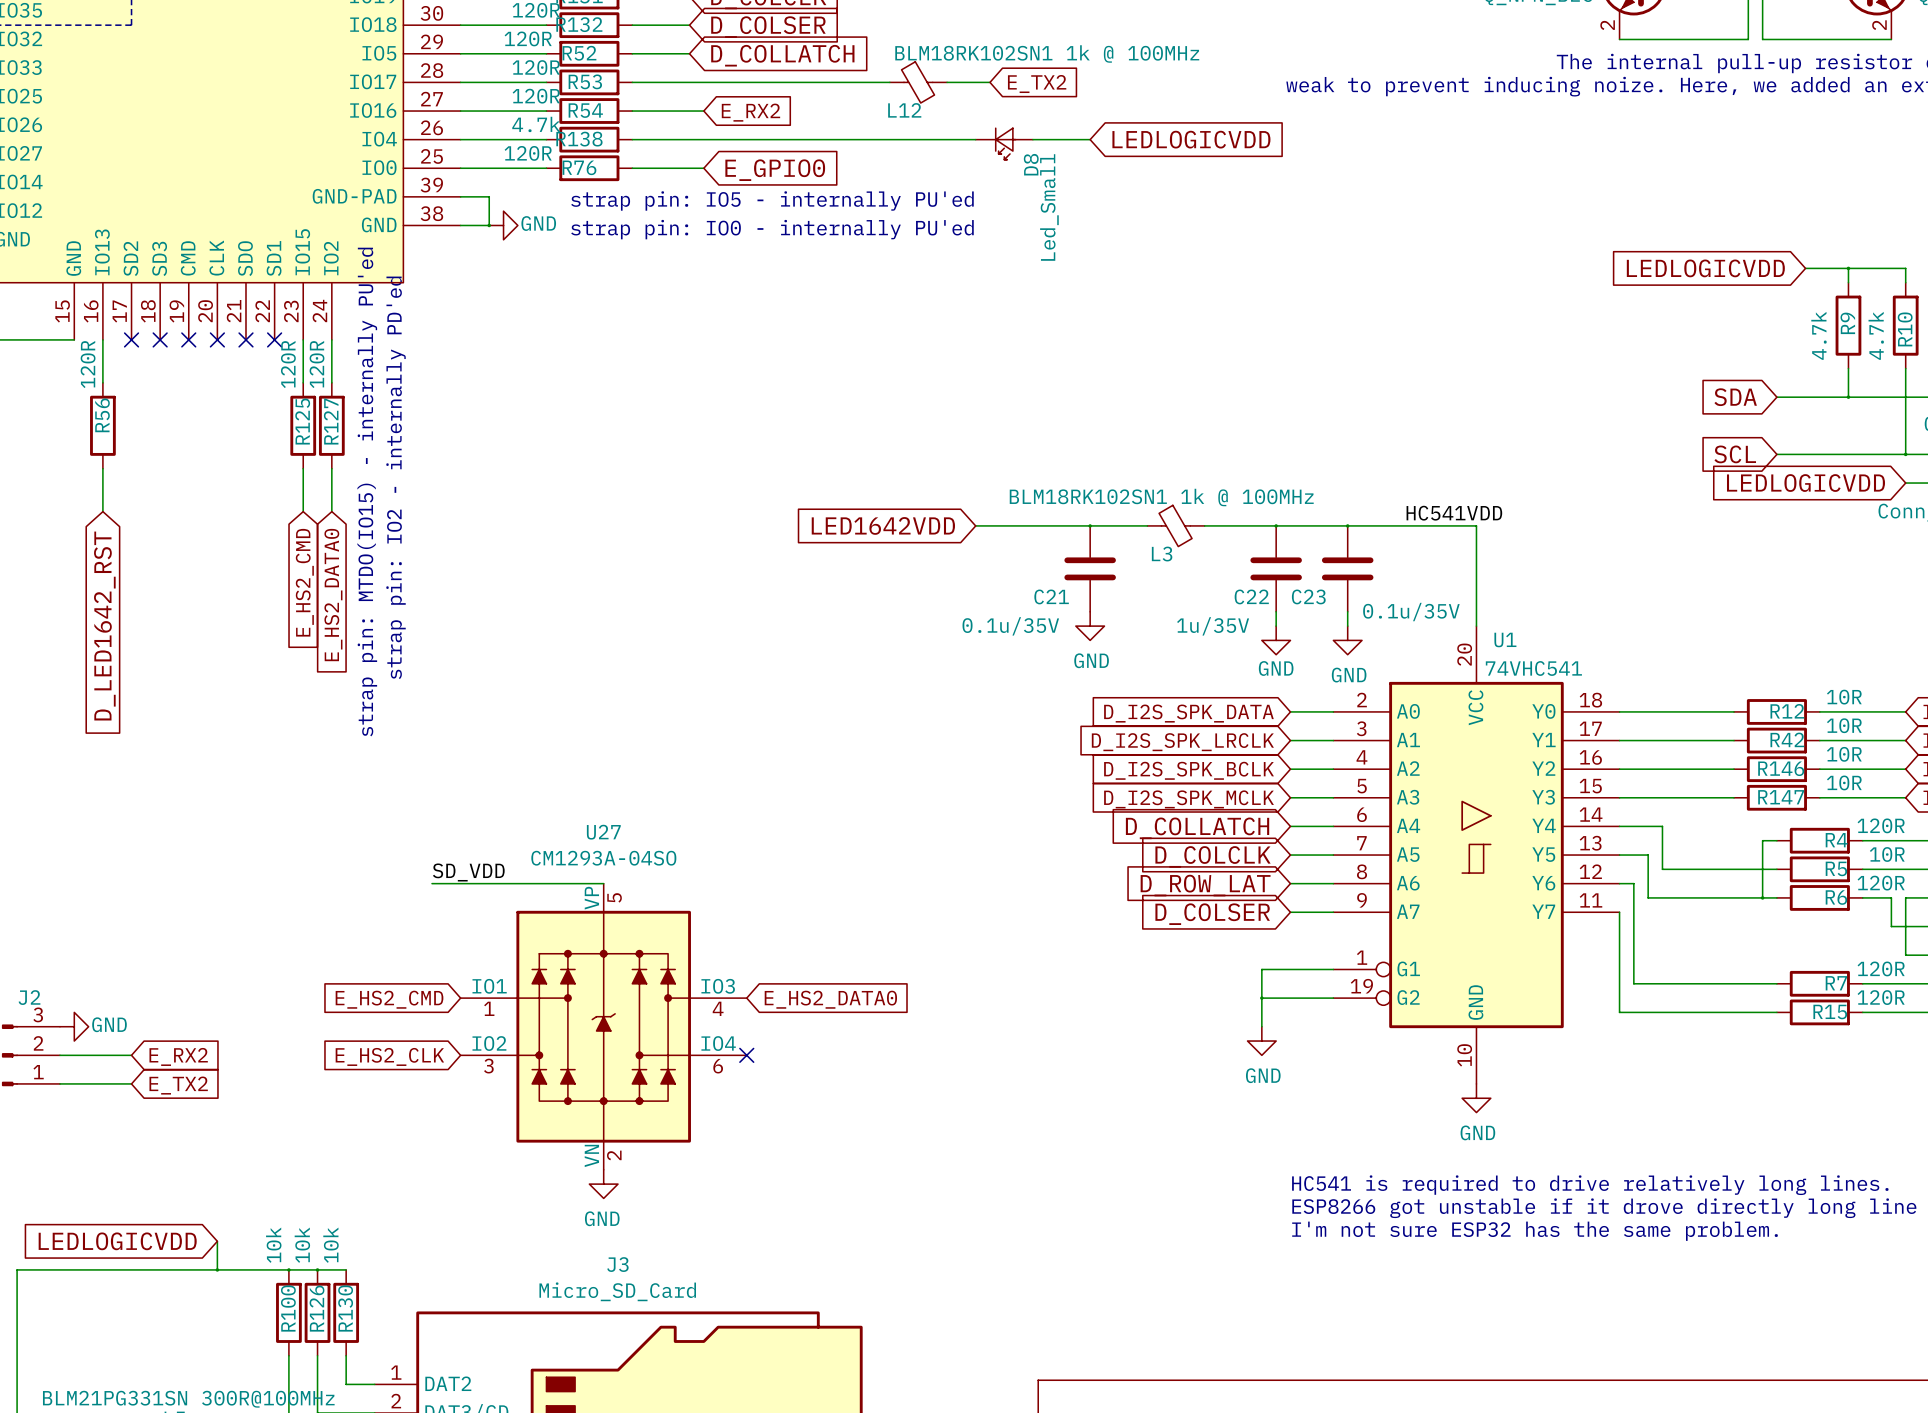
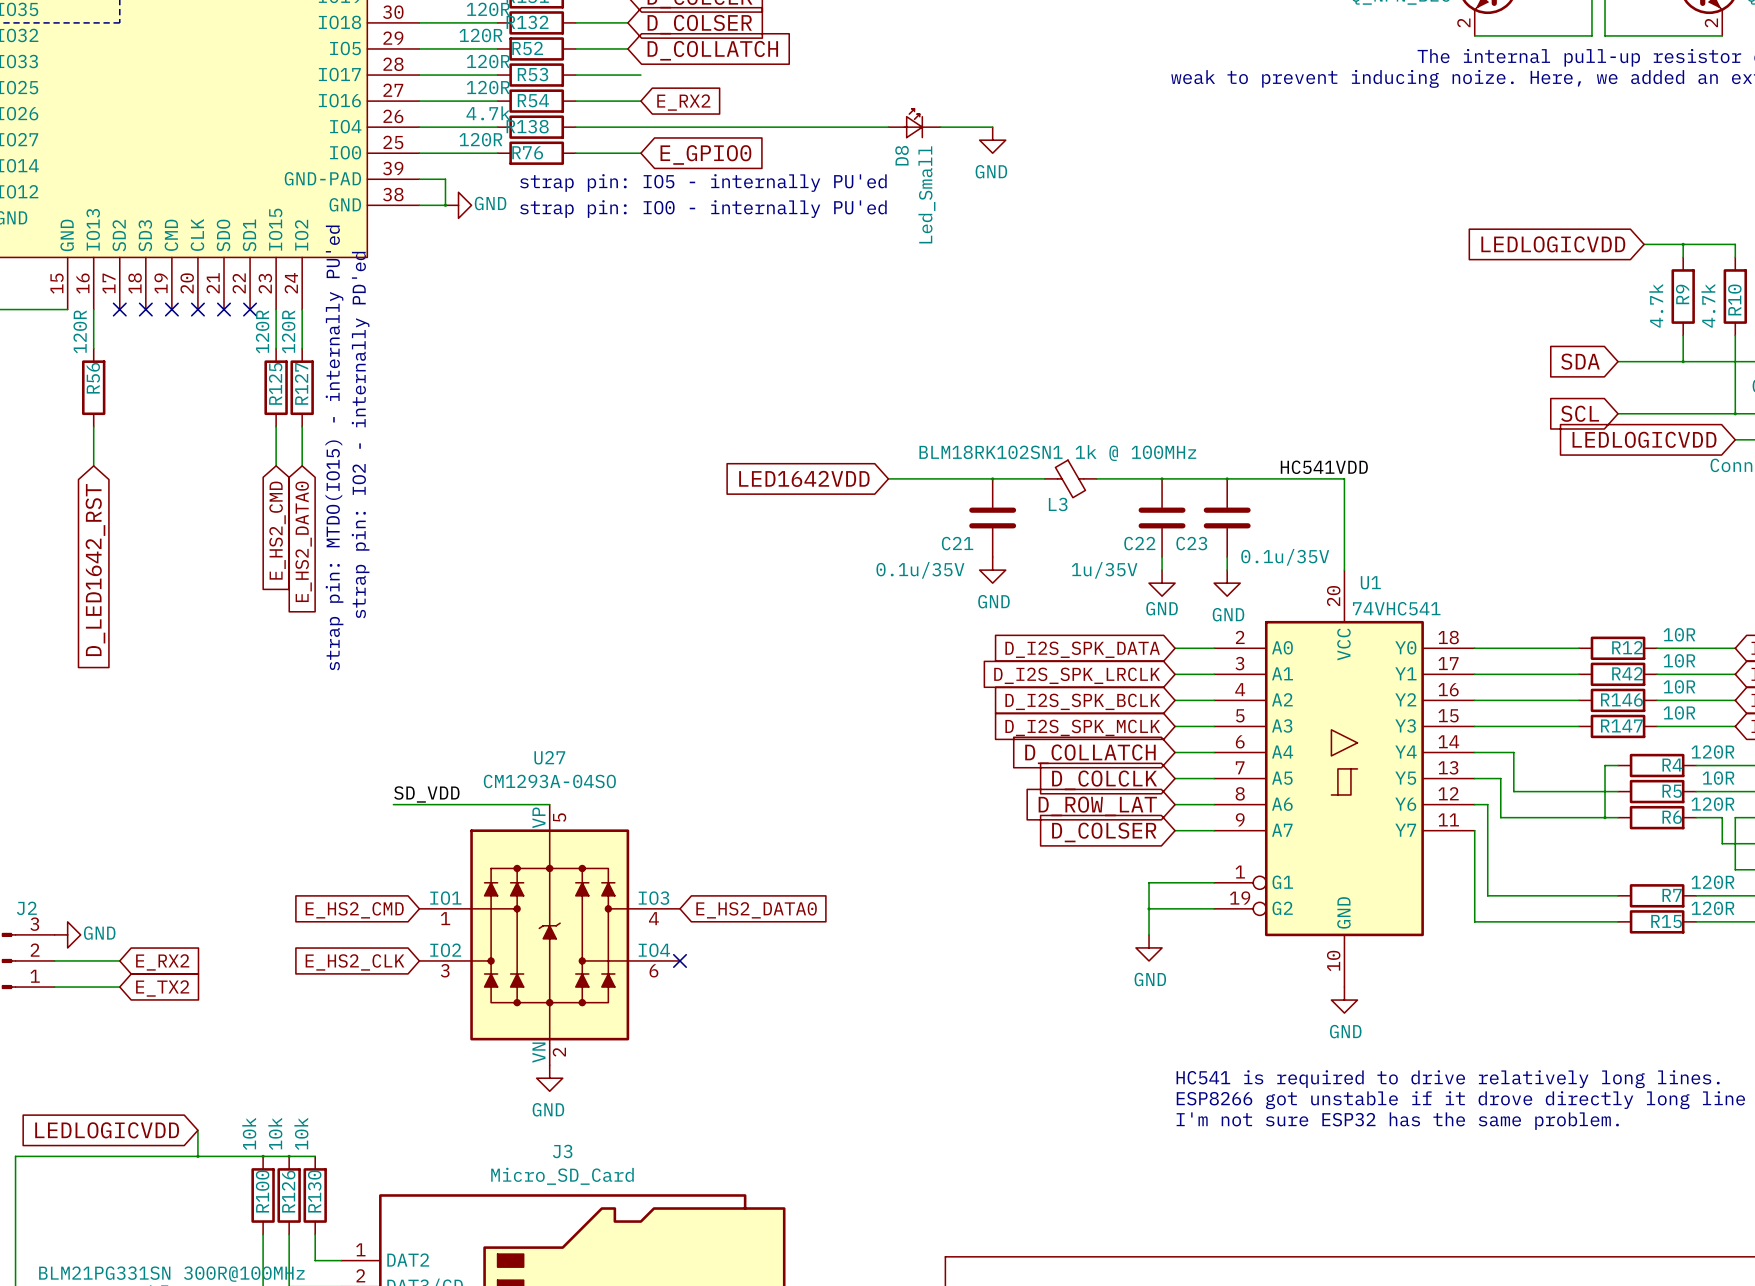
wire: (703, 82) (889, 82) -> none
L12: BLM18RK102SN1 1k @ 100MHz (918, 82) -> none
wire: (947, 82) (990, 82) -> none
global label: E_TX2 (1037, 84) -> none
global label: LEDLOGICVDD (1191, 139) -> none
D8 rotation: 0° (1005, 143) -> 180° (913, 123)
power symbol: none -> GND (992, 140)
D8 name position: D8 (1031, 164) -> D8 (902, 155)
D8 value position: Led_Small (1049, 207) -> Led_Small (926, 194)

